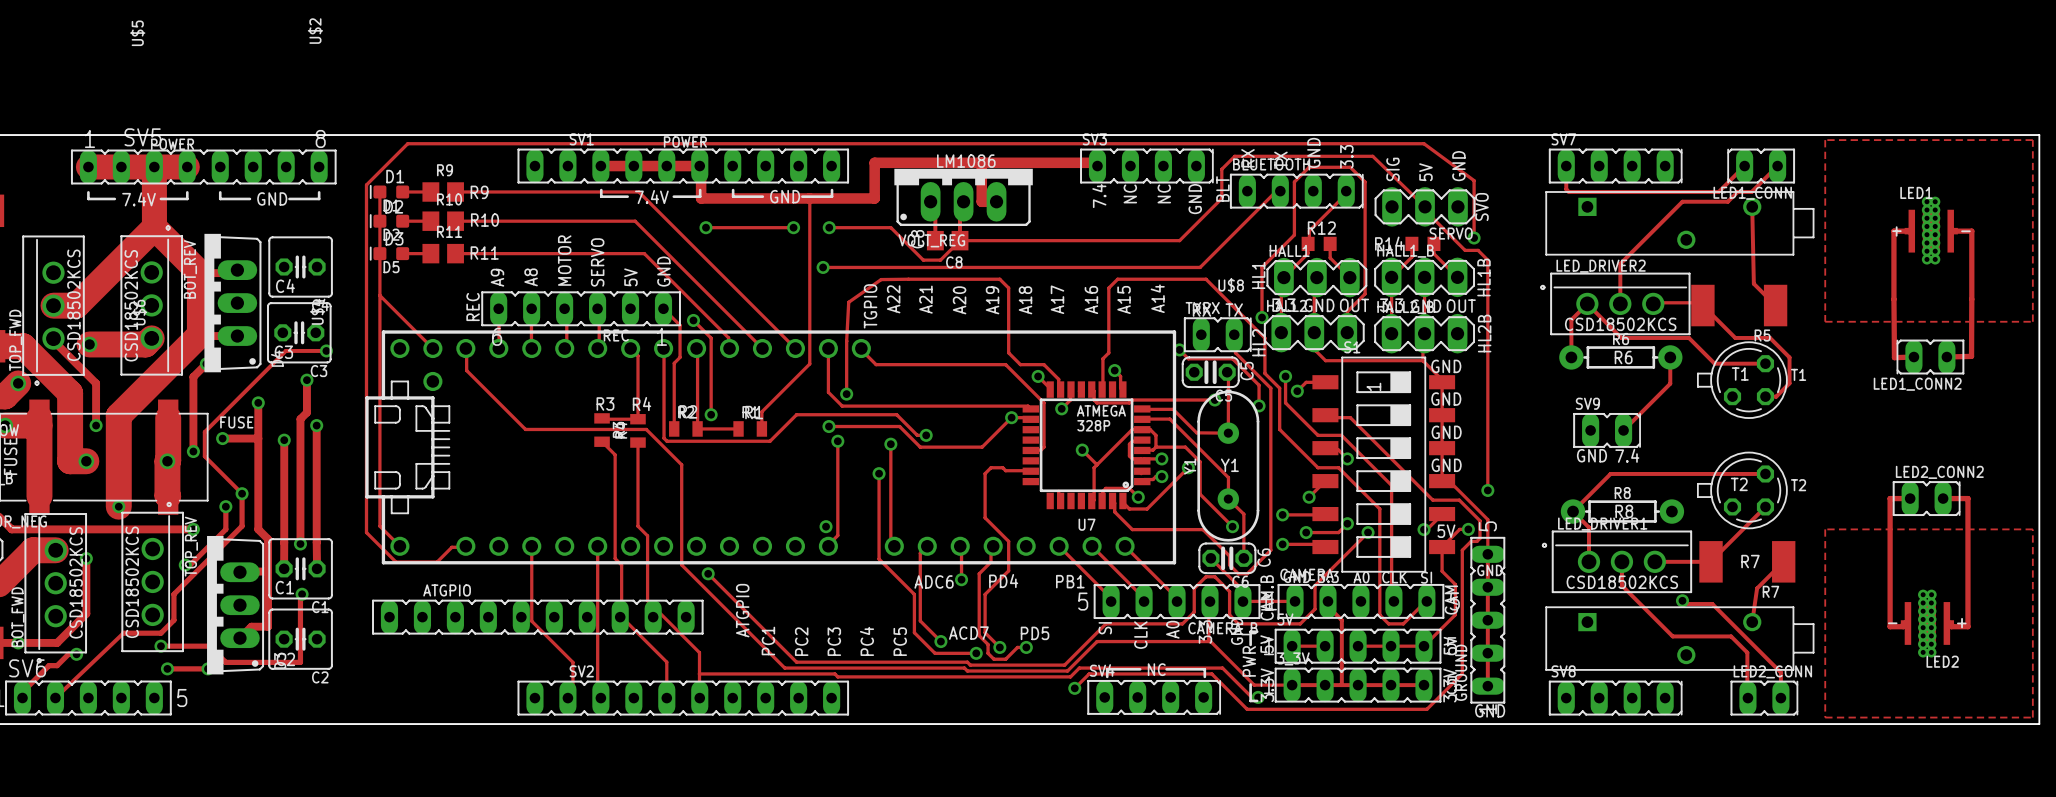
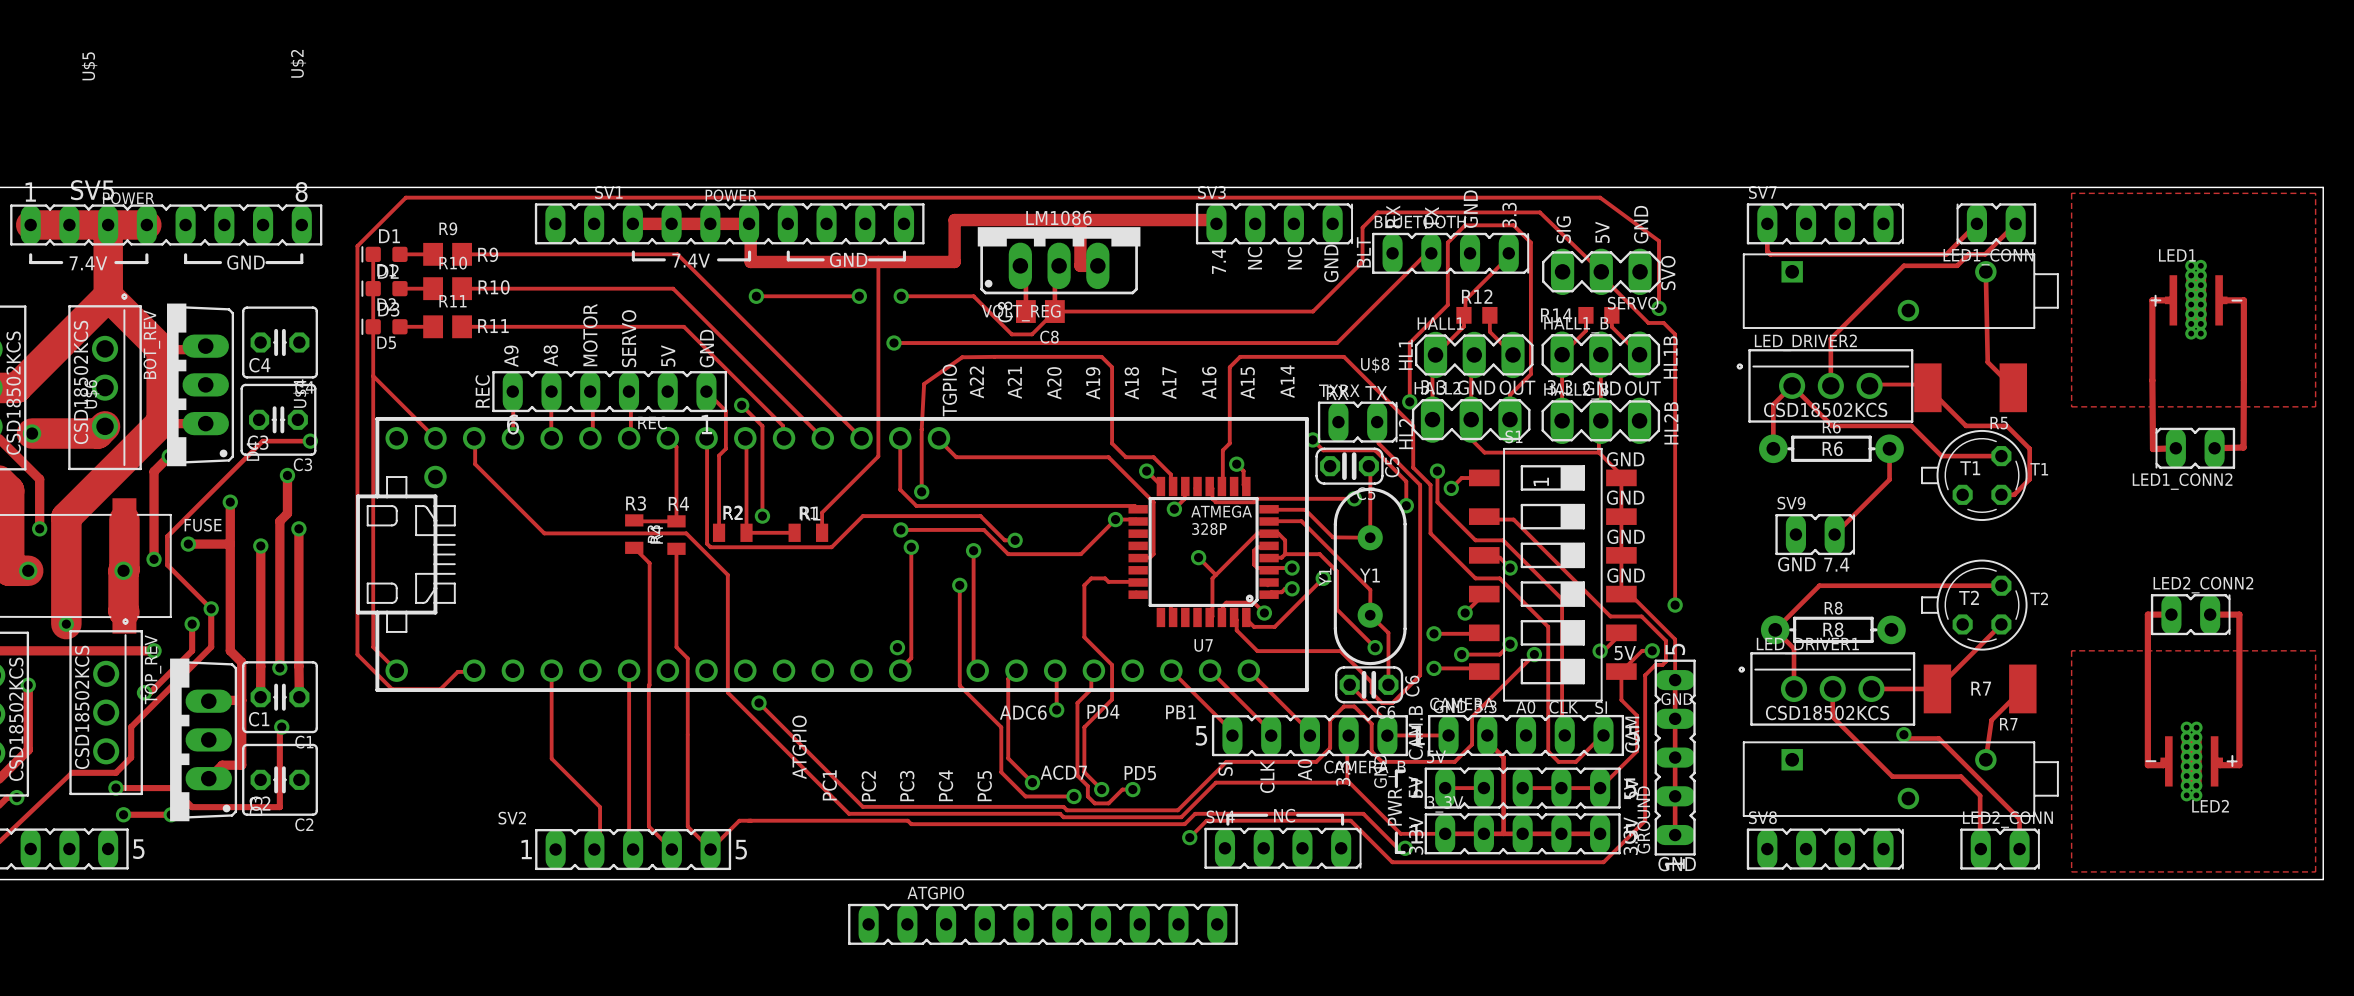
track: (615, 558) (621, 565) (621, 616) (666, 662) (666, 698) -> (649, 685) (648, 826) (671, 849)
track: (647, 600) (699, 652) (699, 698) -> (687, 734) (687, 826) (710, 849) (739, 820) (748, 820)
ATGPIO: (537, 617) -> none
SV2 footprint: [517, 680, 850, 716] -> [535, 828, 732, 871]
ATGPIO: none -> (1042, 924)

